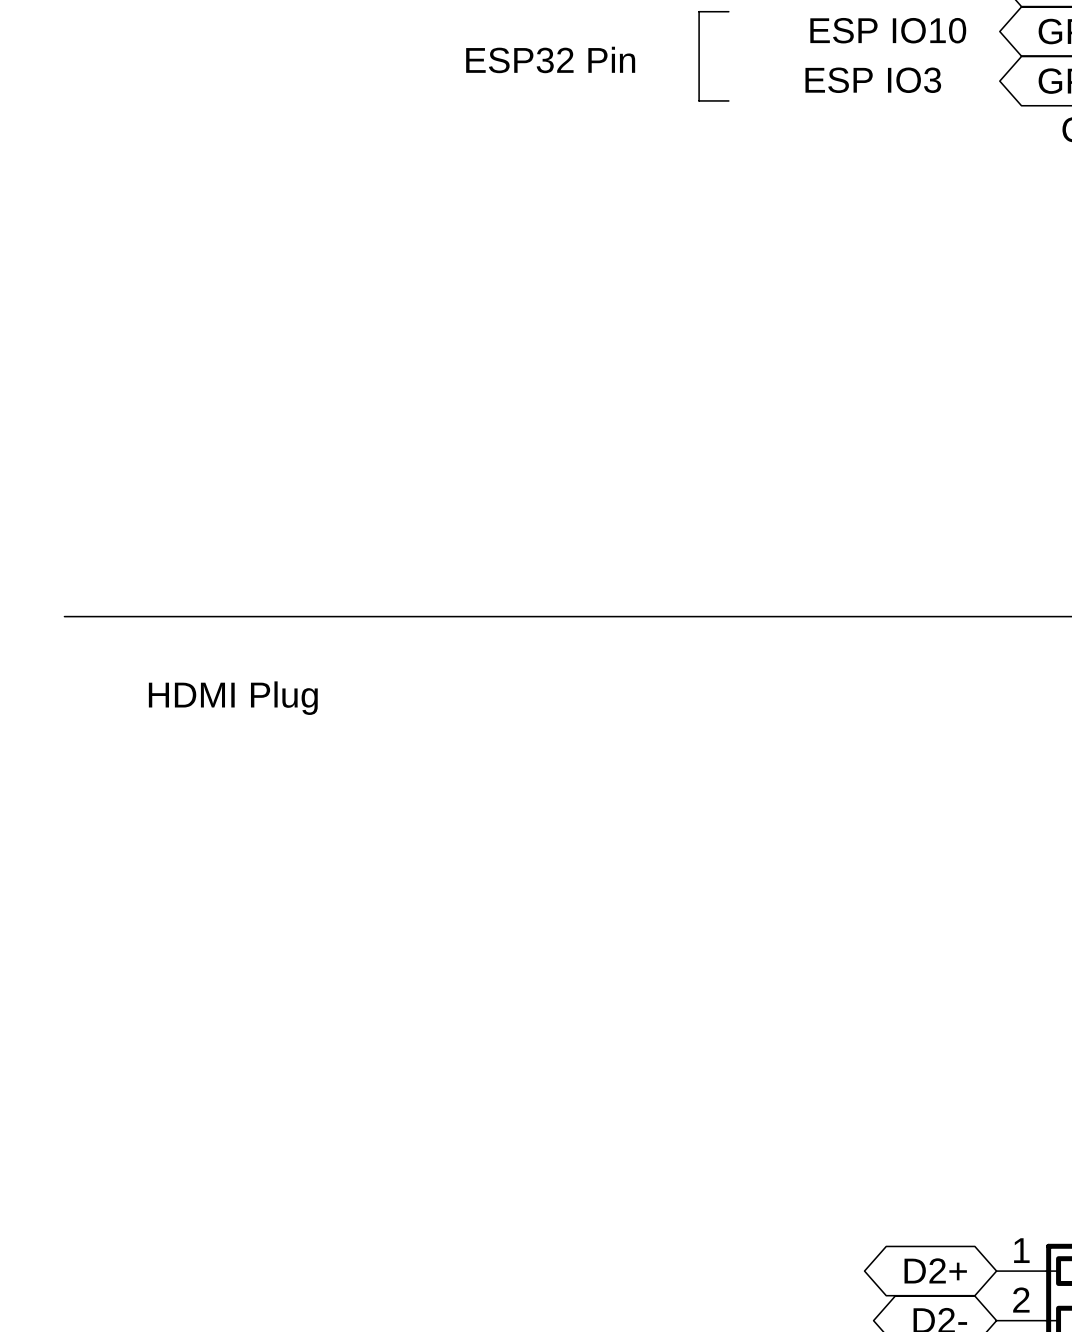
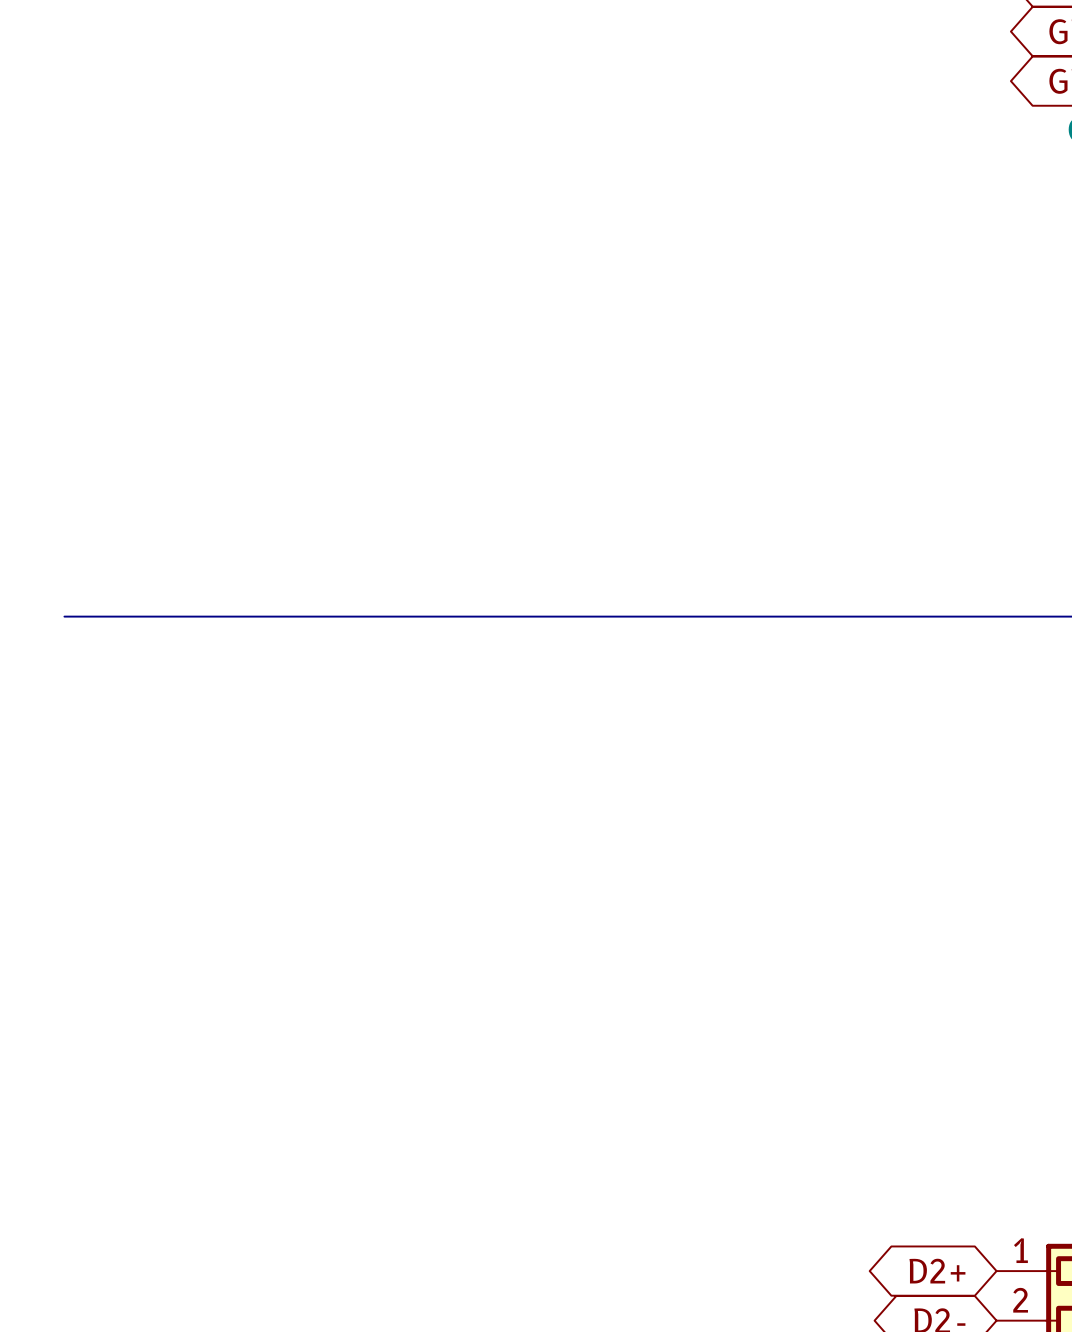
line: (728, 11) (699, 11) (699, 100) (728, 100) -> none
text: ESP IO10 (888, 30) -> none
text: ESP32 Pin (550, 59) -> none
text: ESP IO3 (873, 80) -> none
text: HDMI Plug (233, 698) -> none

